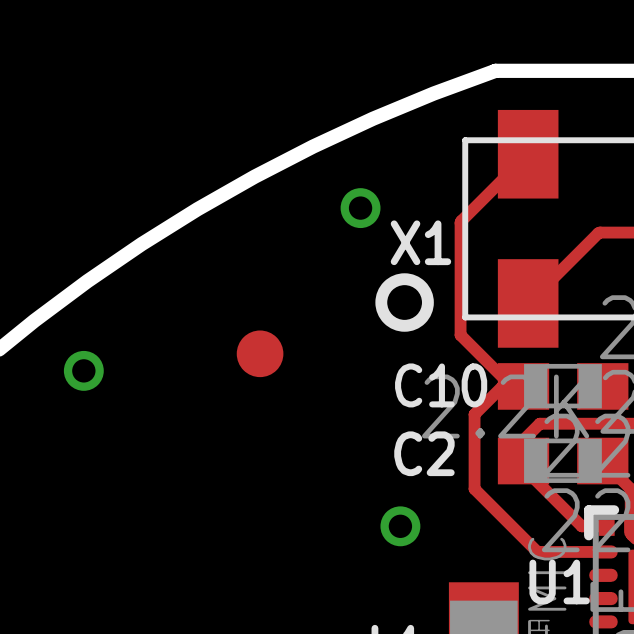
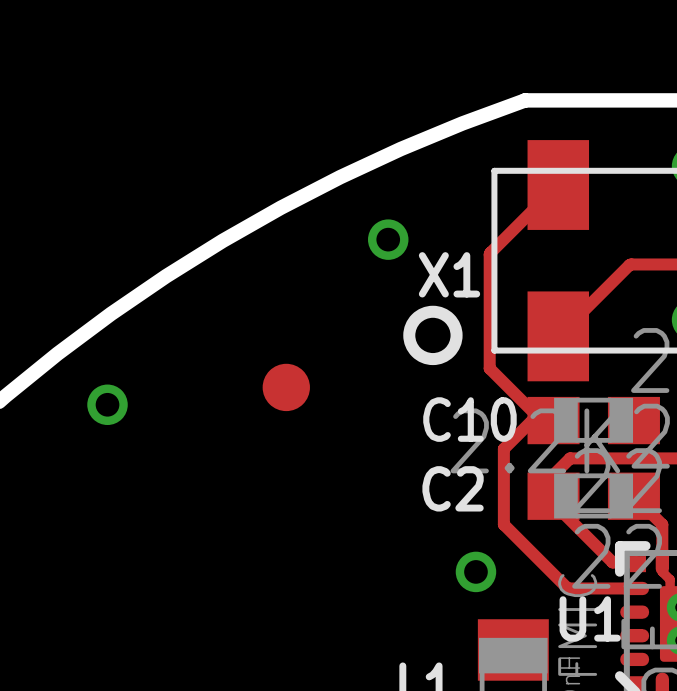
via position: (400, 526) -> (475, 571)

